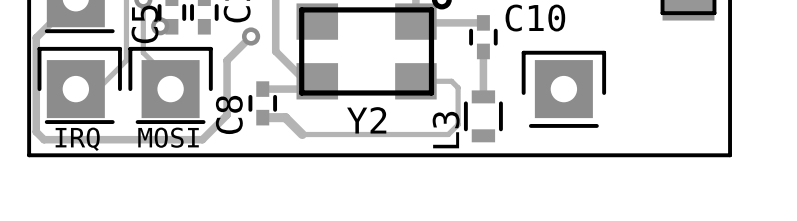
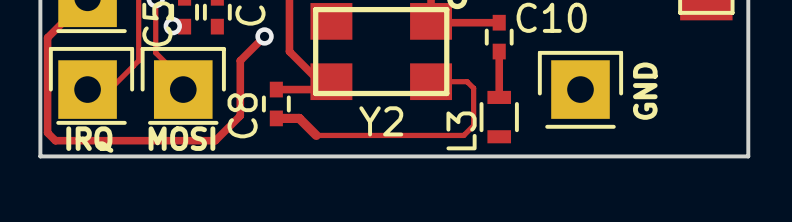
text: none -> GND (645, 91)

